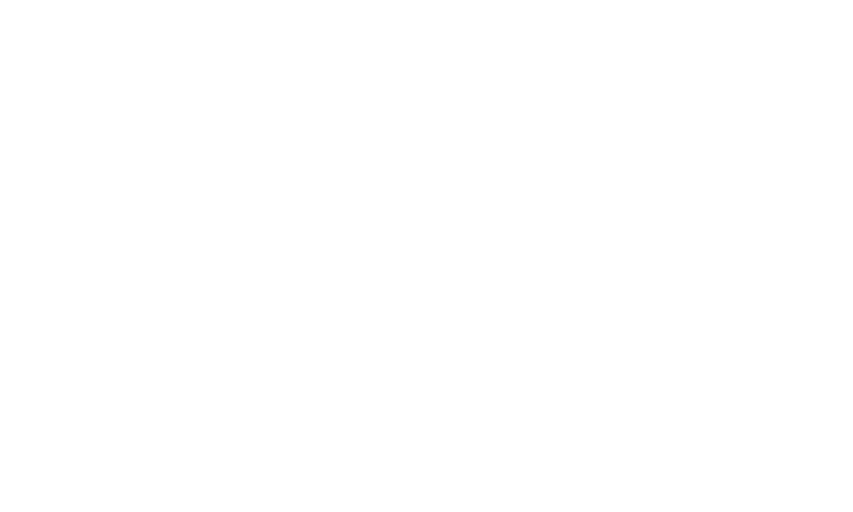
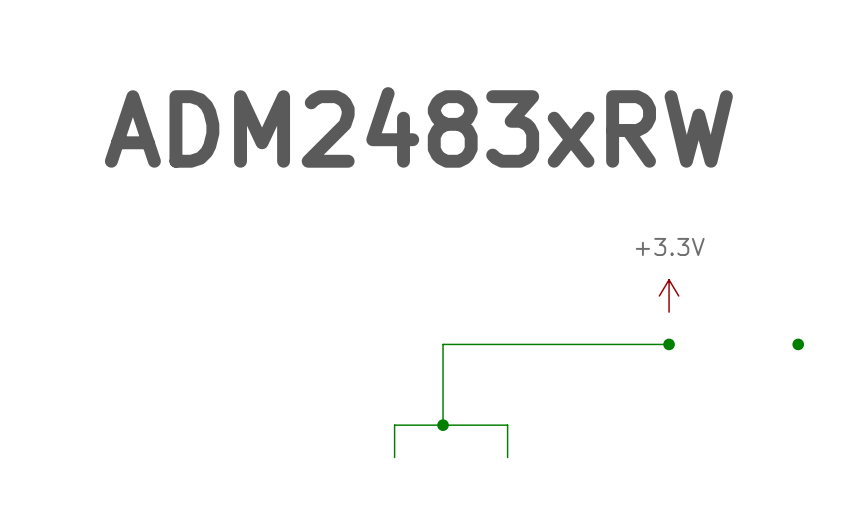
text: none -> ADM2483xRW (418, 127)
power symbol: none -> +3.3V (669, 296)
wire: none -> (669, 344) (443, 344) (443, 425)
junction: none -> (669, 344)
junction: none -> (798, 344)
junction: none -> (443, 425)
wire: none -> (394, 457) (394, 425) (507, 425) (507, 457)

